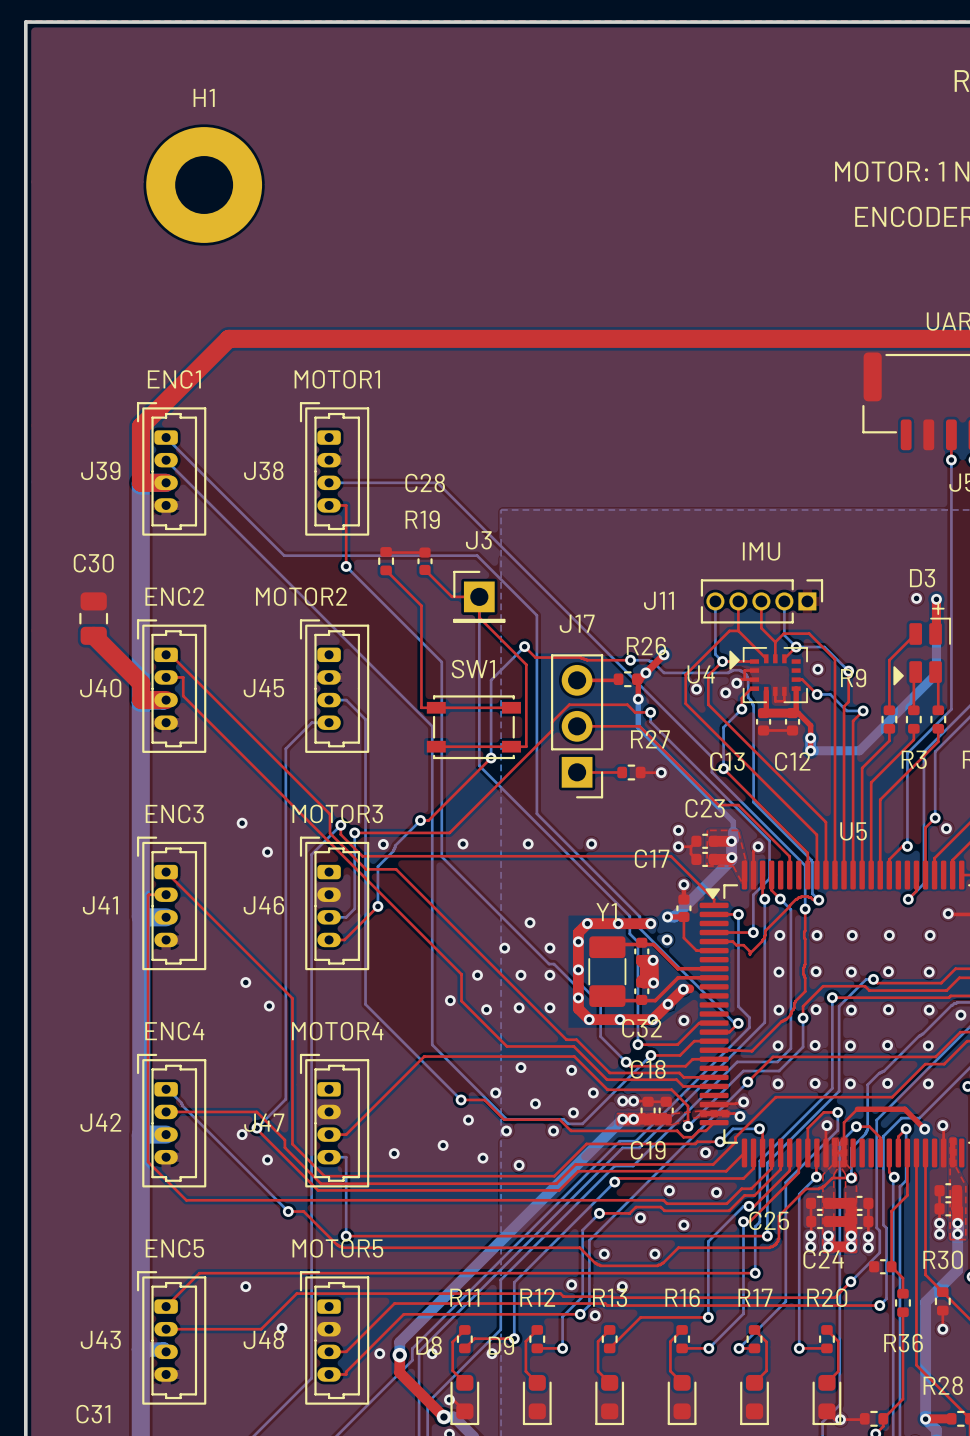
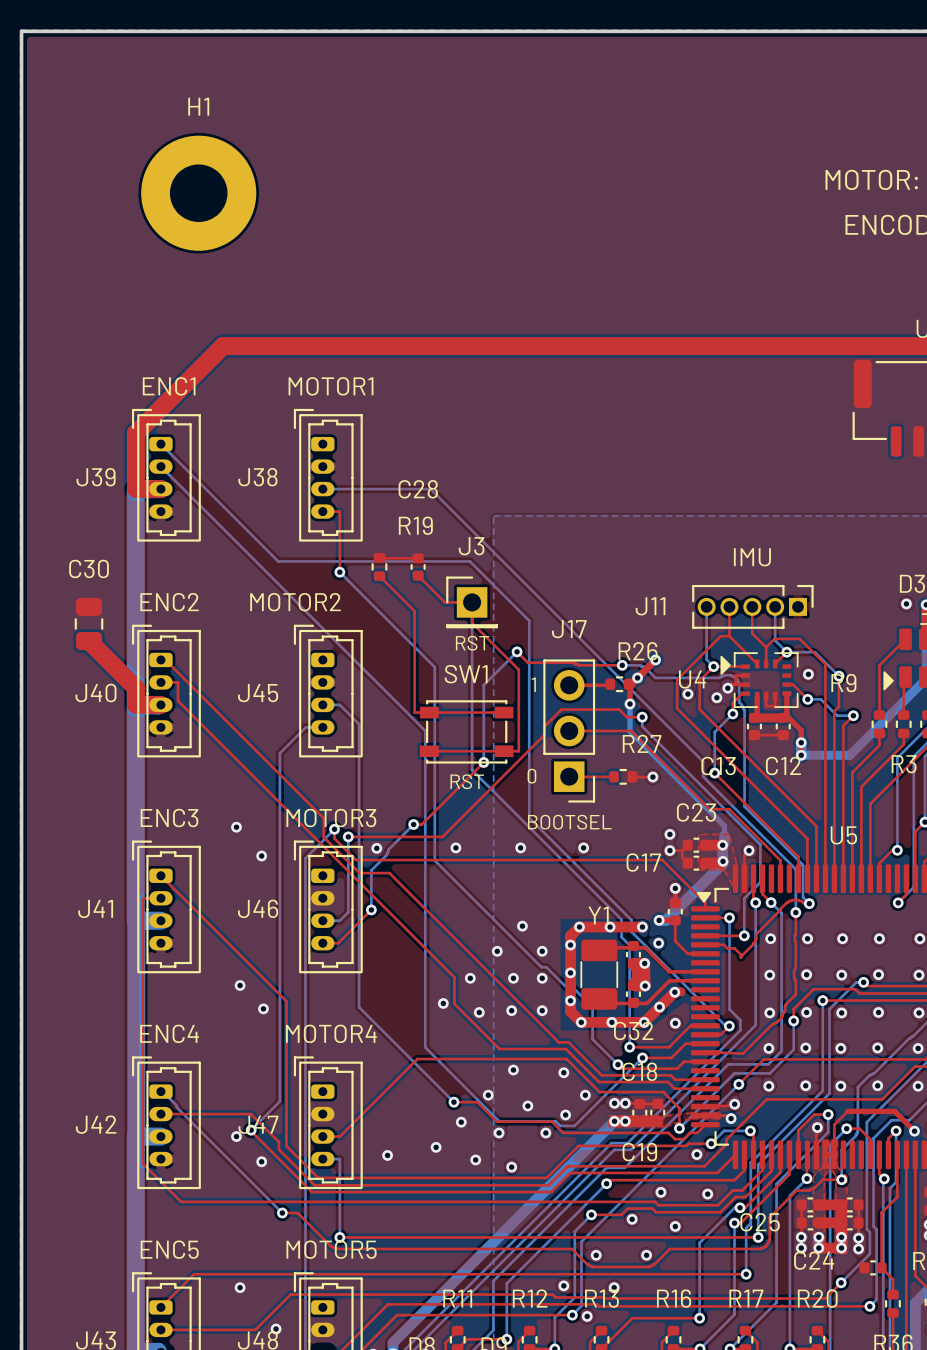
text: none -> RST (472, 643)
text: none -> 1 (533, 684)
text: none -> 0 (531, 776)
text: none -> RST (467, 781)
text: none -> BOOTSEL (569, 822)

